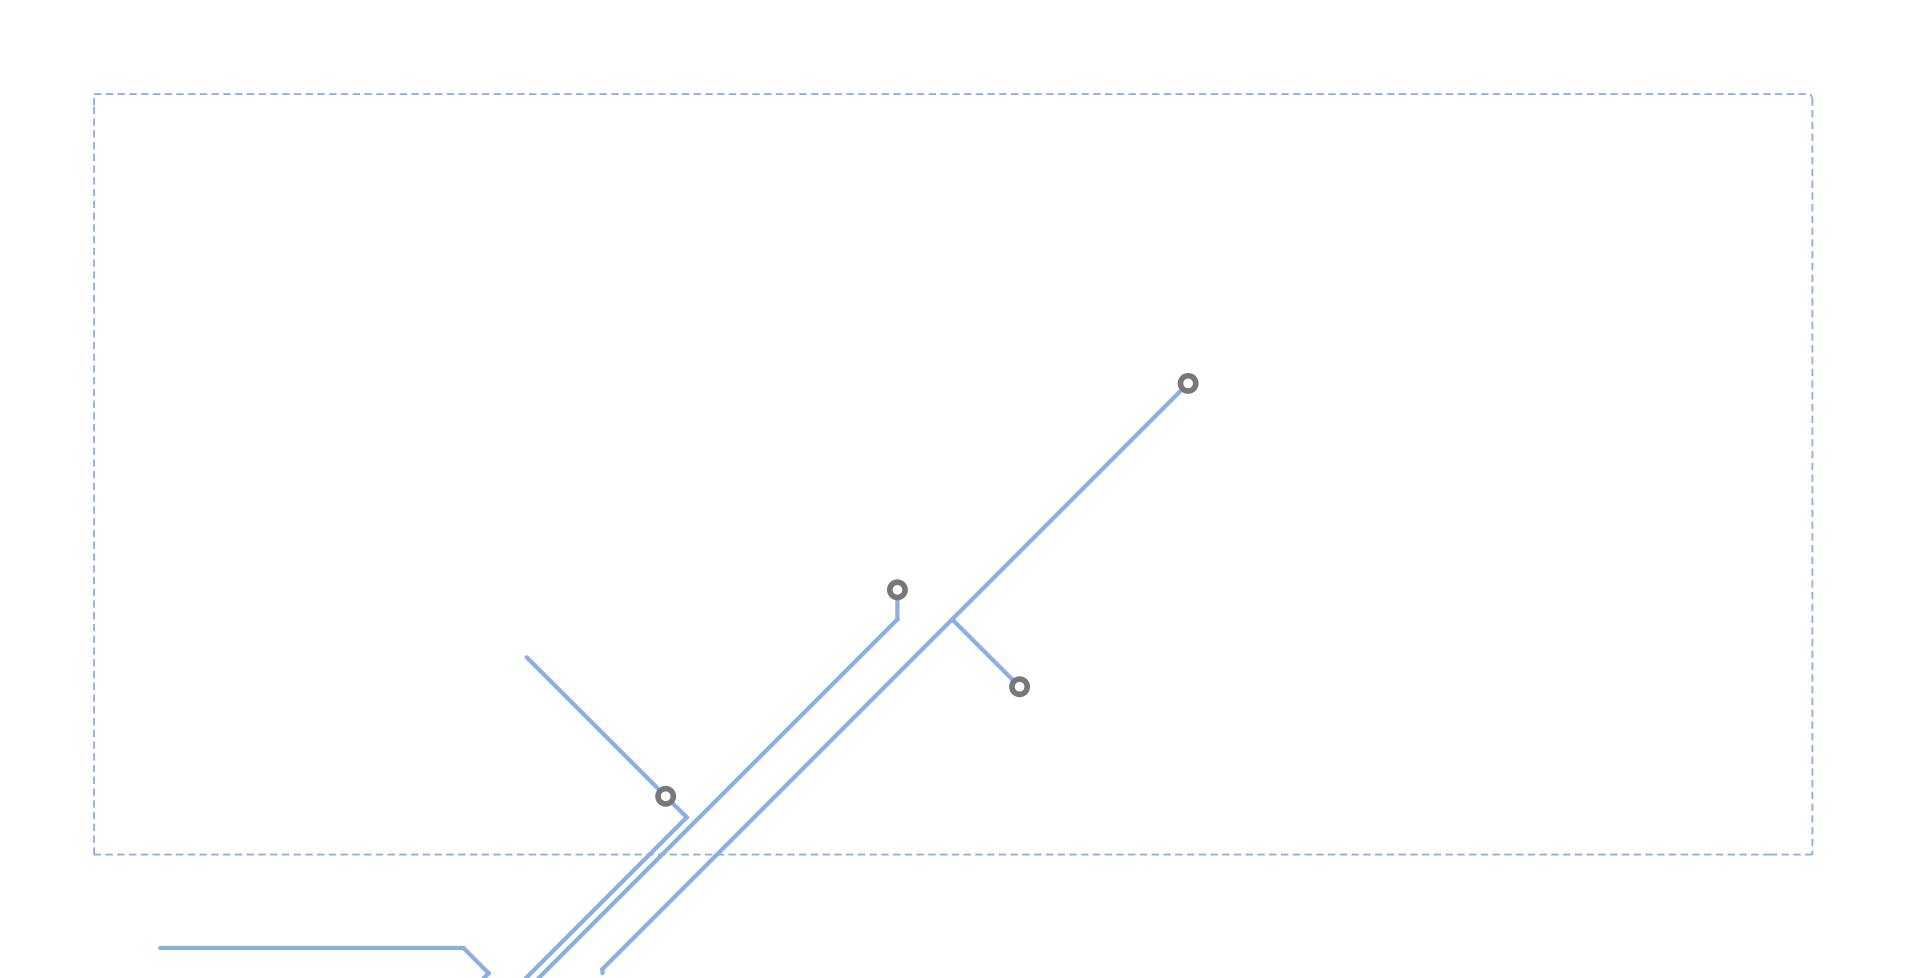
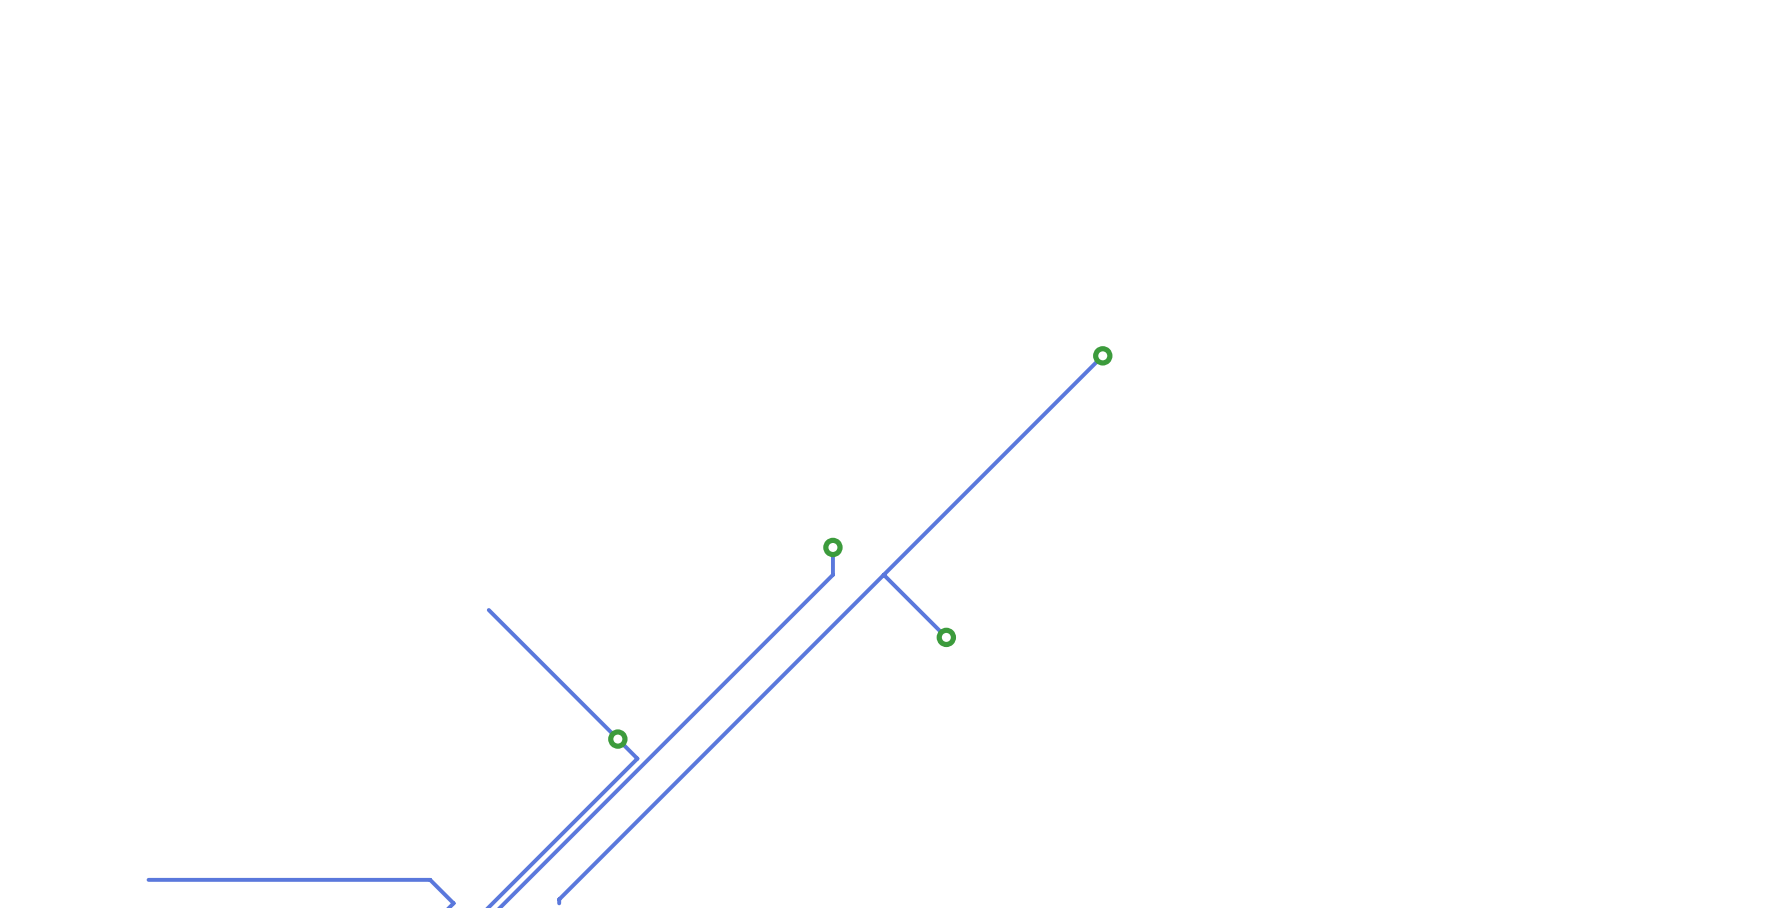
zone outline: (1810, 94) (94, 94) (94, 854) (1812, 854) (1812, 98) (1810, 94) -> none

